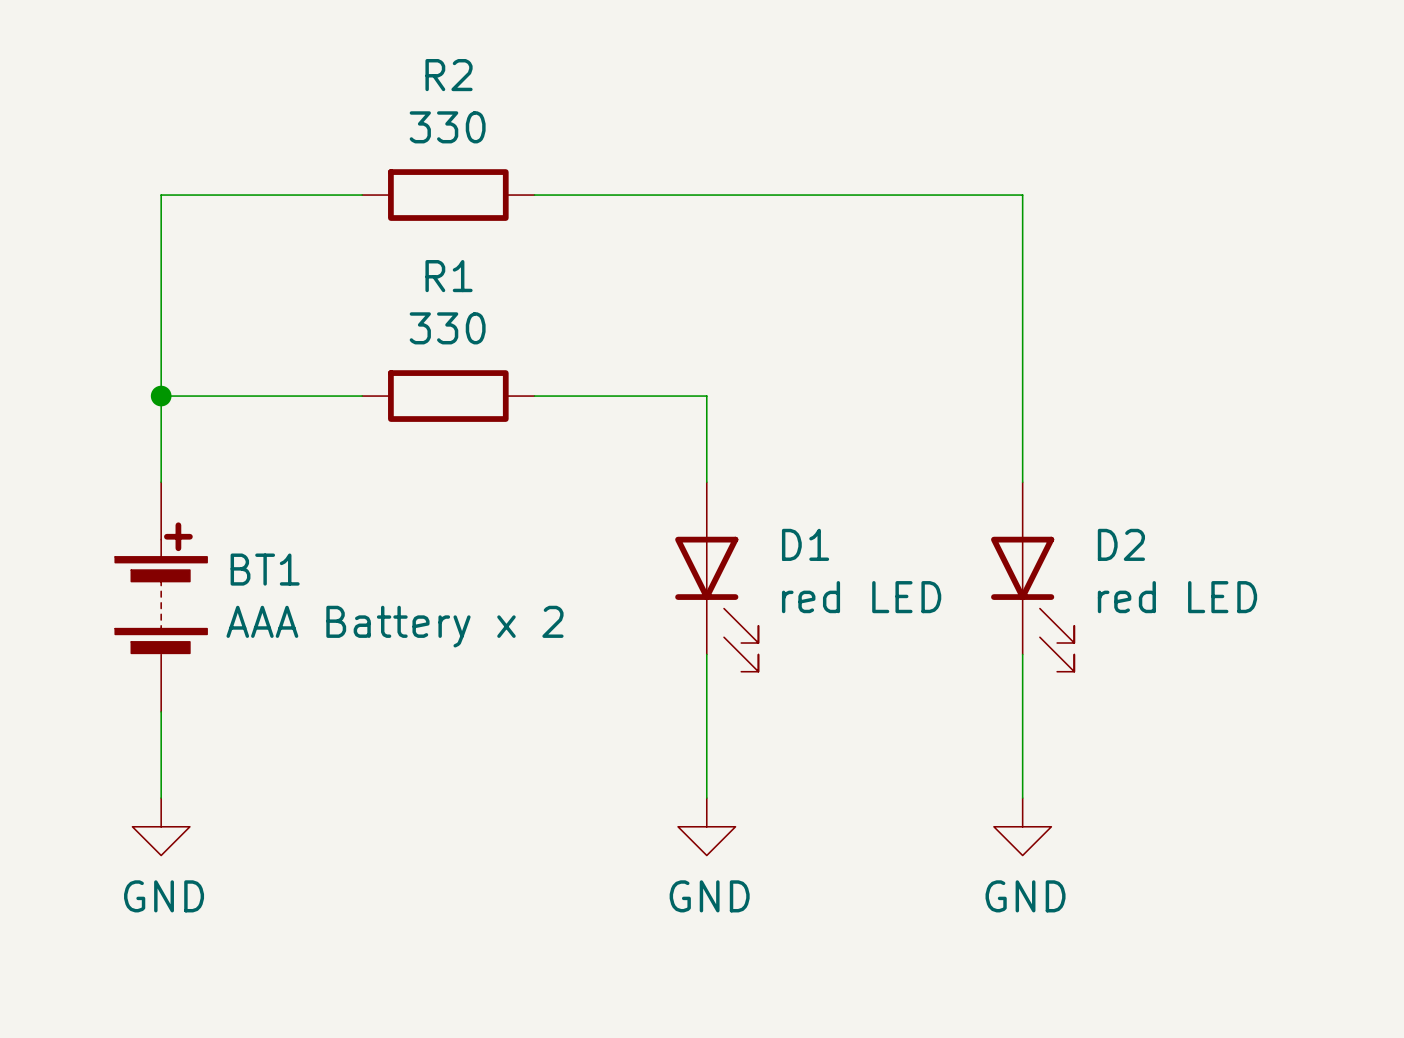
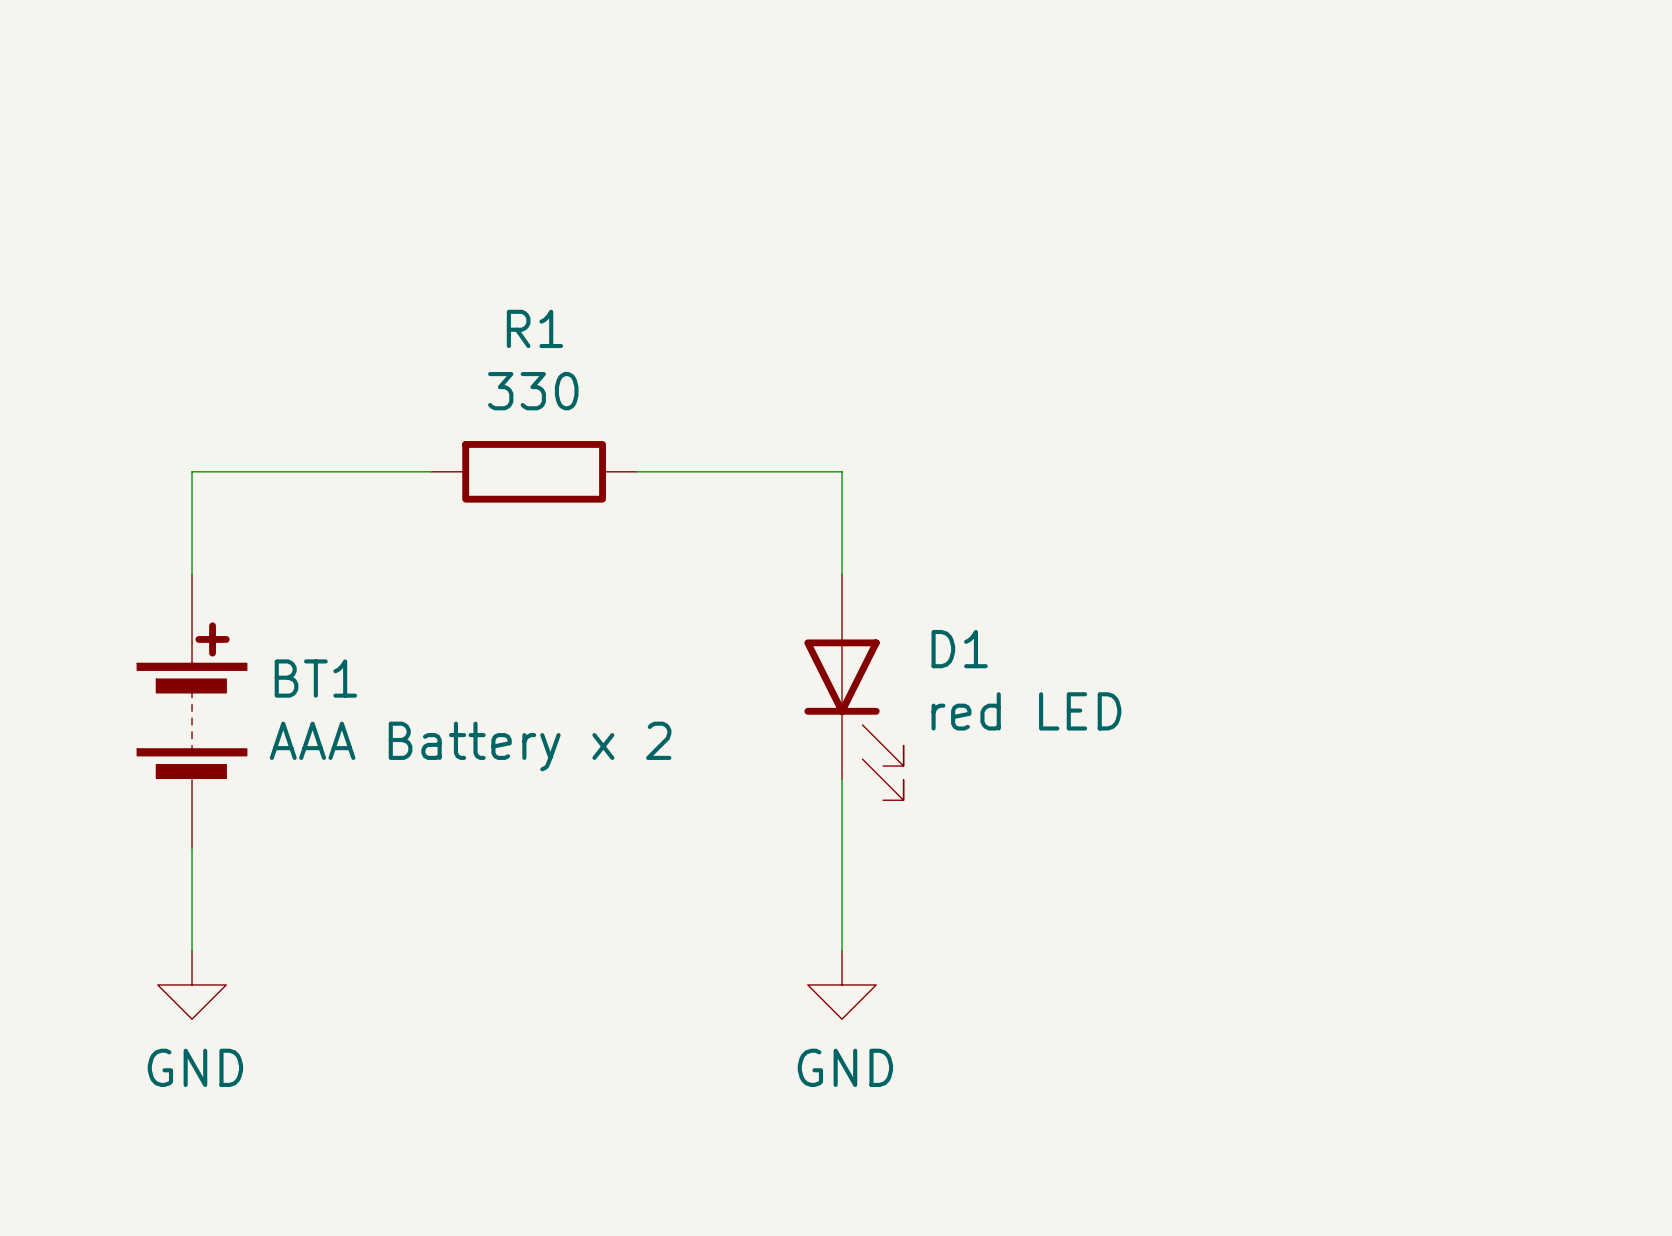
wire: (362, 195) (161, 195) (161, 396) -> none
R2: 330 (448, 195) -> none
wire: (534, 195) (1022, 195) (1022, 482) -> none
junction: (161, 396) -> none
D2: red LED (1032, 576) -> none
wire: (1022, 654) (1022, 798) -> none
power symbol: GND (1022, 826) -> none

